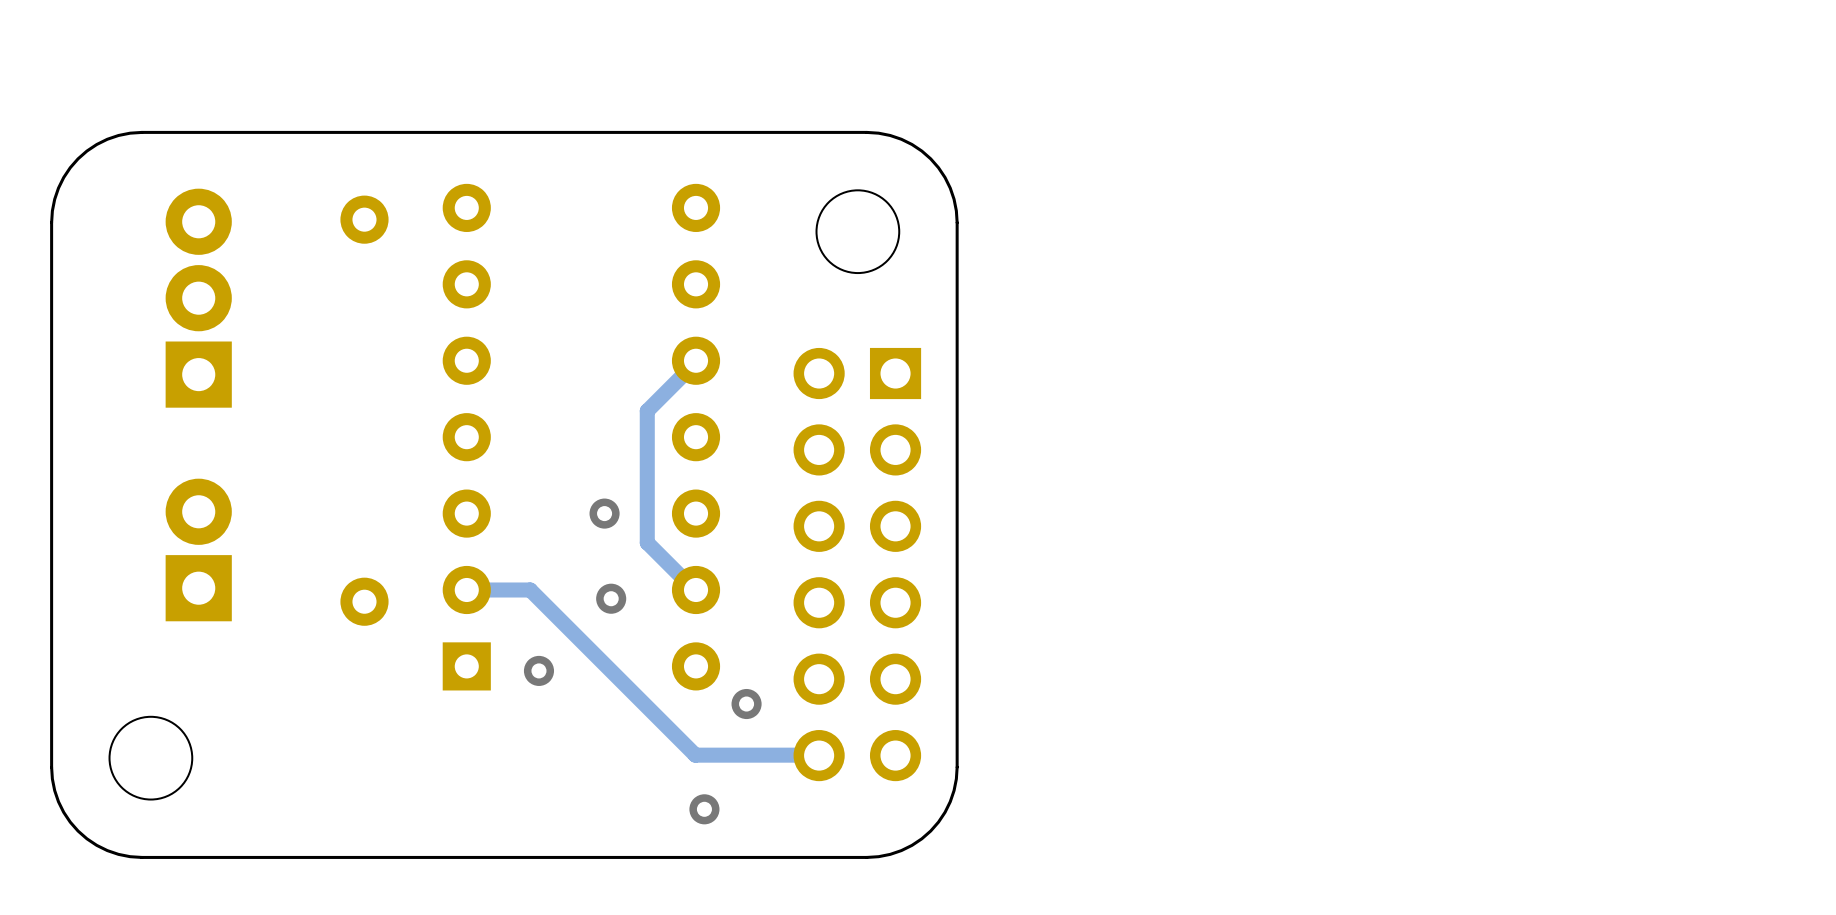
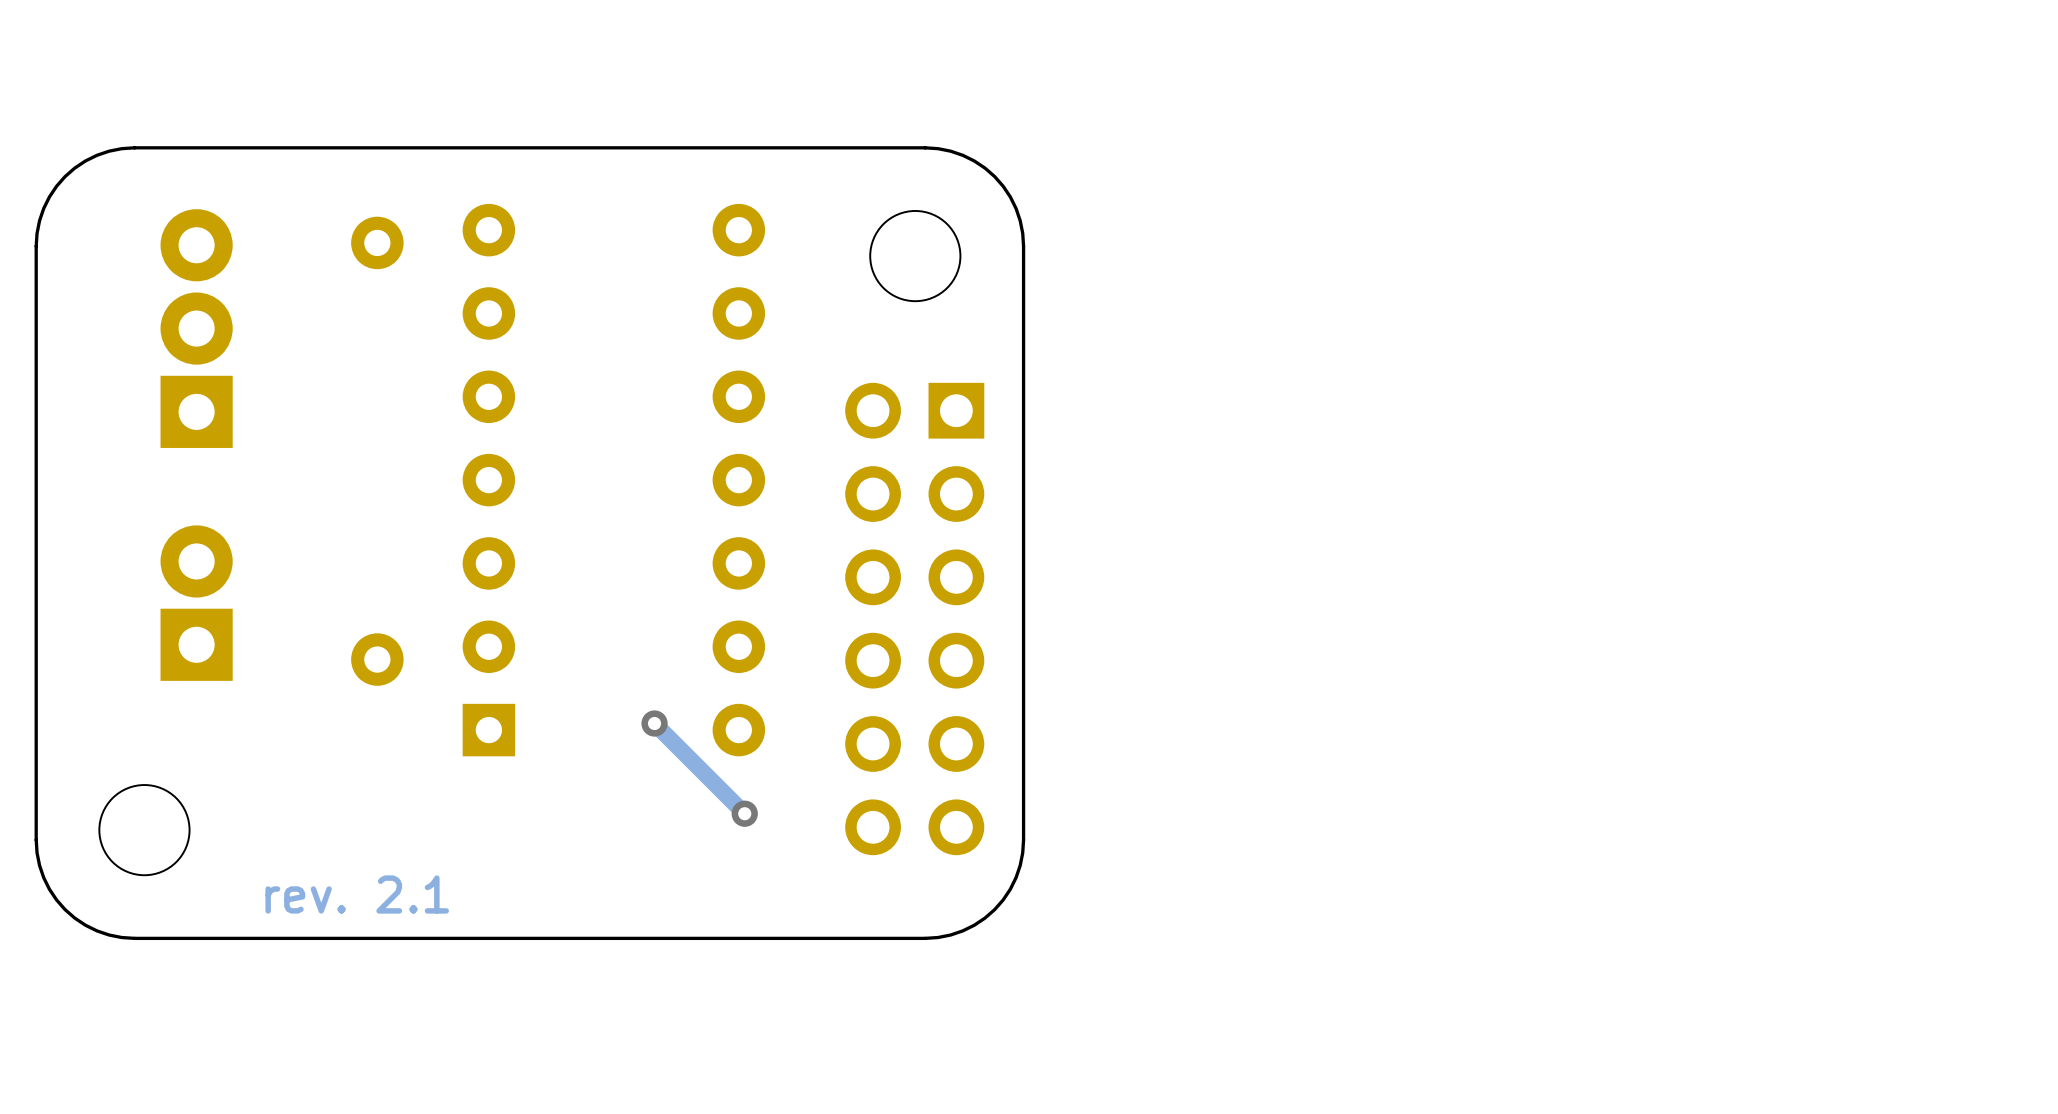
track: (696, 362) (647, 410) (647, 542) (696, 591) -> none
via: (604, 513) -> none
track: (466, 589) (530, 589) (695, 755) (818, 755) -> none
via: (611, 598) -> none
track: none -> (654, 723) (744, 813)
via: none -> (654, 723)
via: (538, 670) -> none
via: (746, 704) -> none
via: none -> (744, 813)
via: (704, 809) -> none
text: none -> rev. 2.1 (357, 894)

